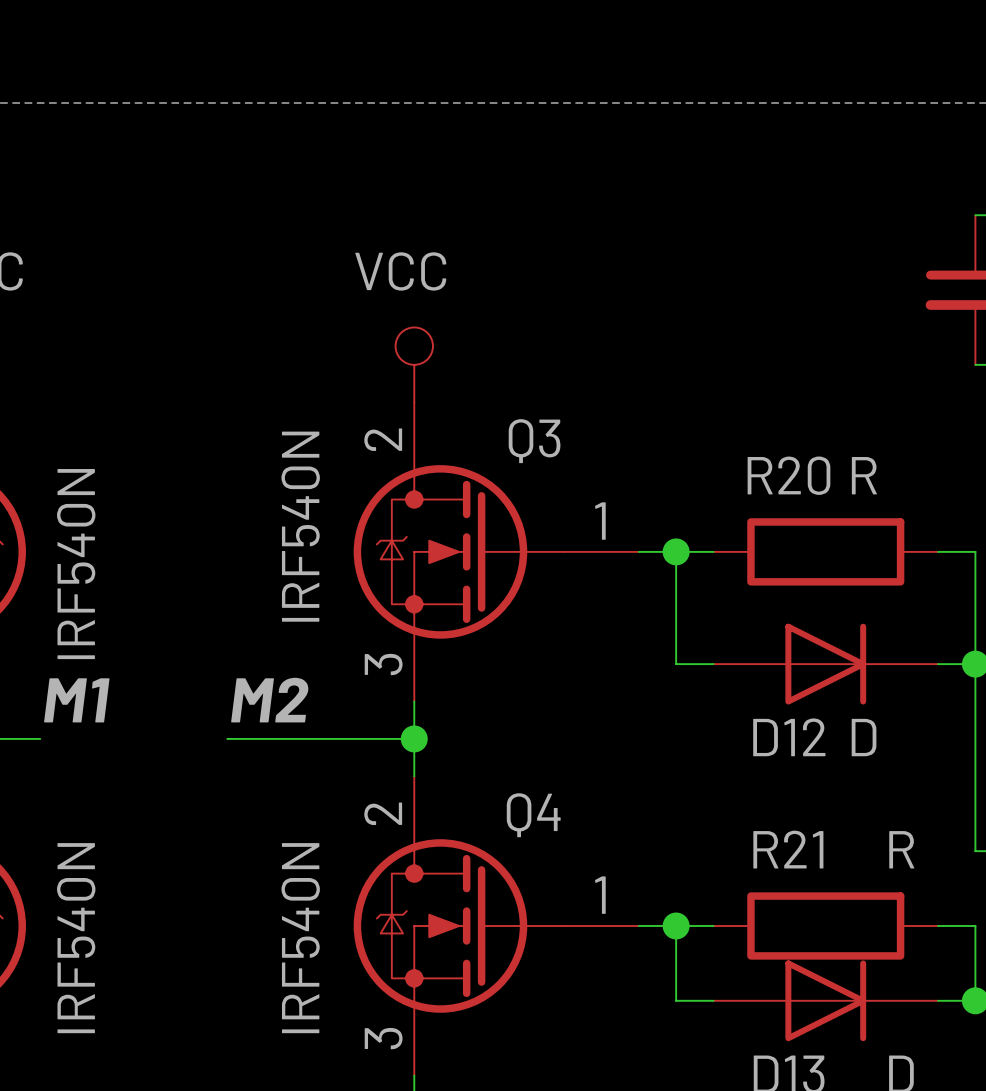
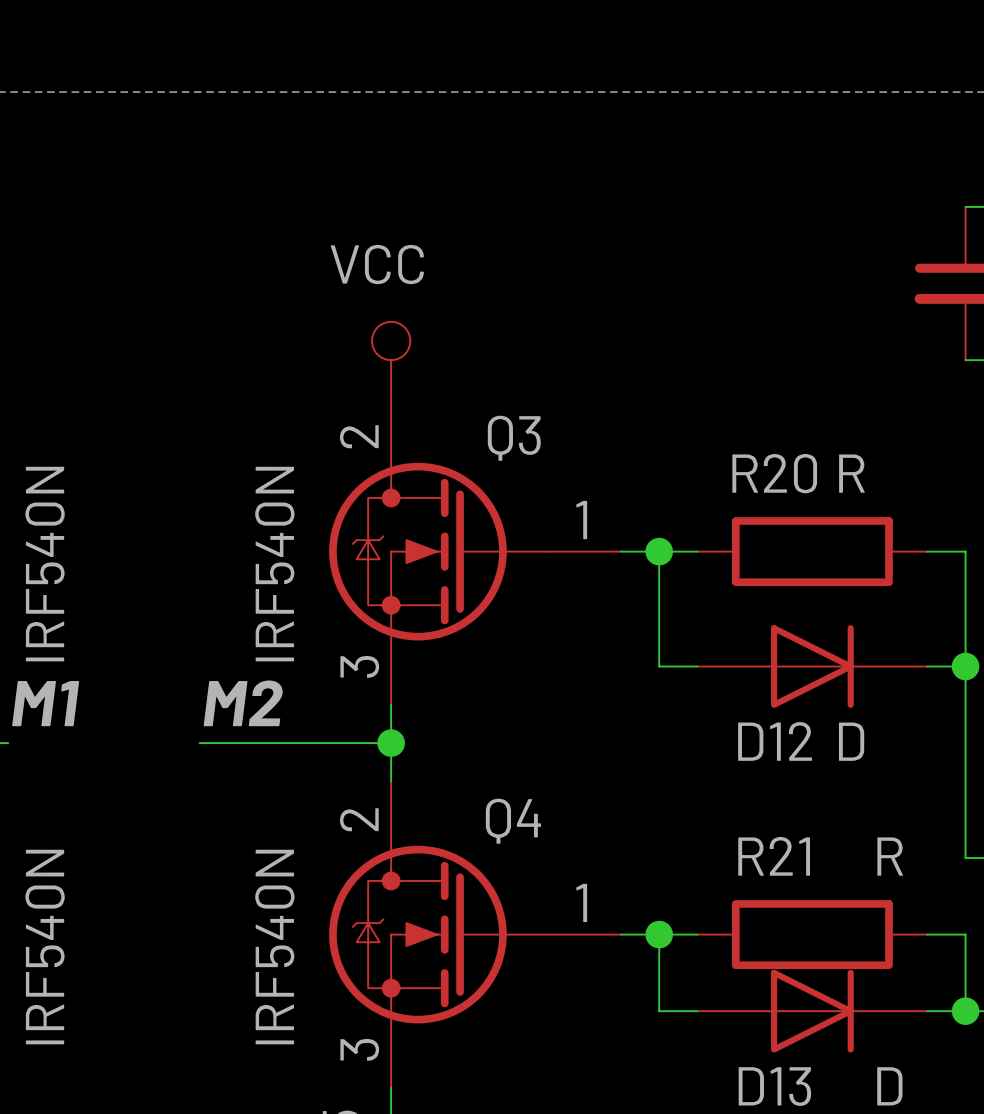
Q3 value position: IRF540N (300, 526) -> IRF540N (274, 564)

